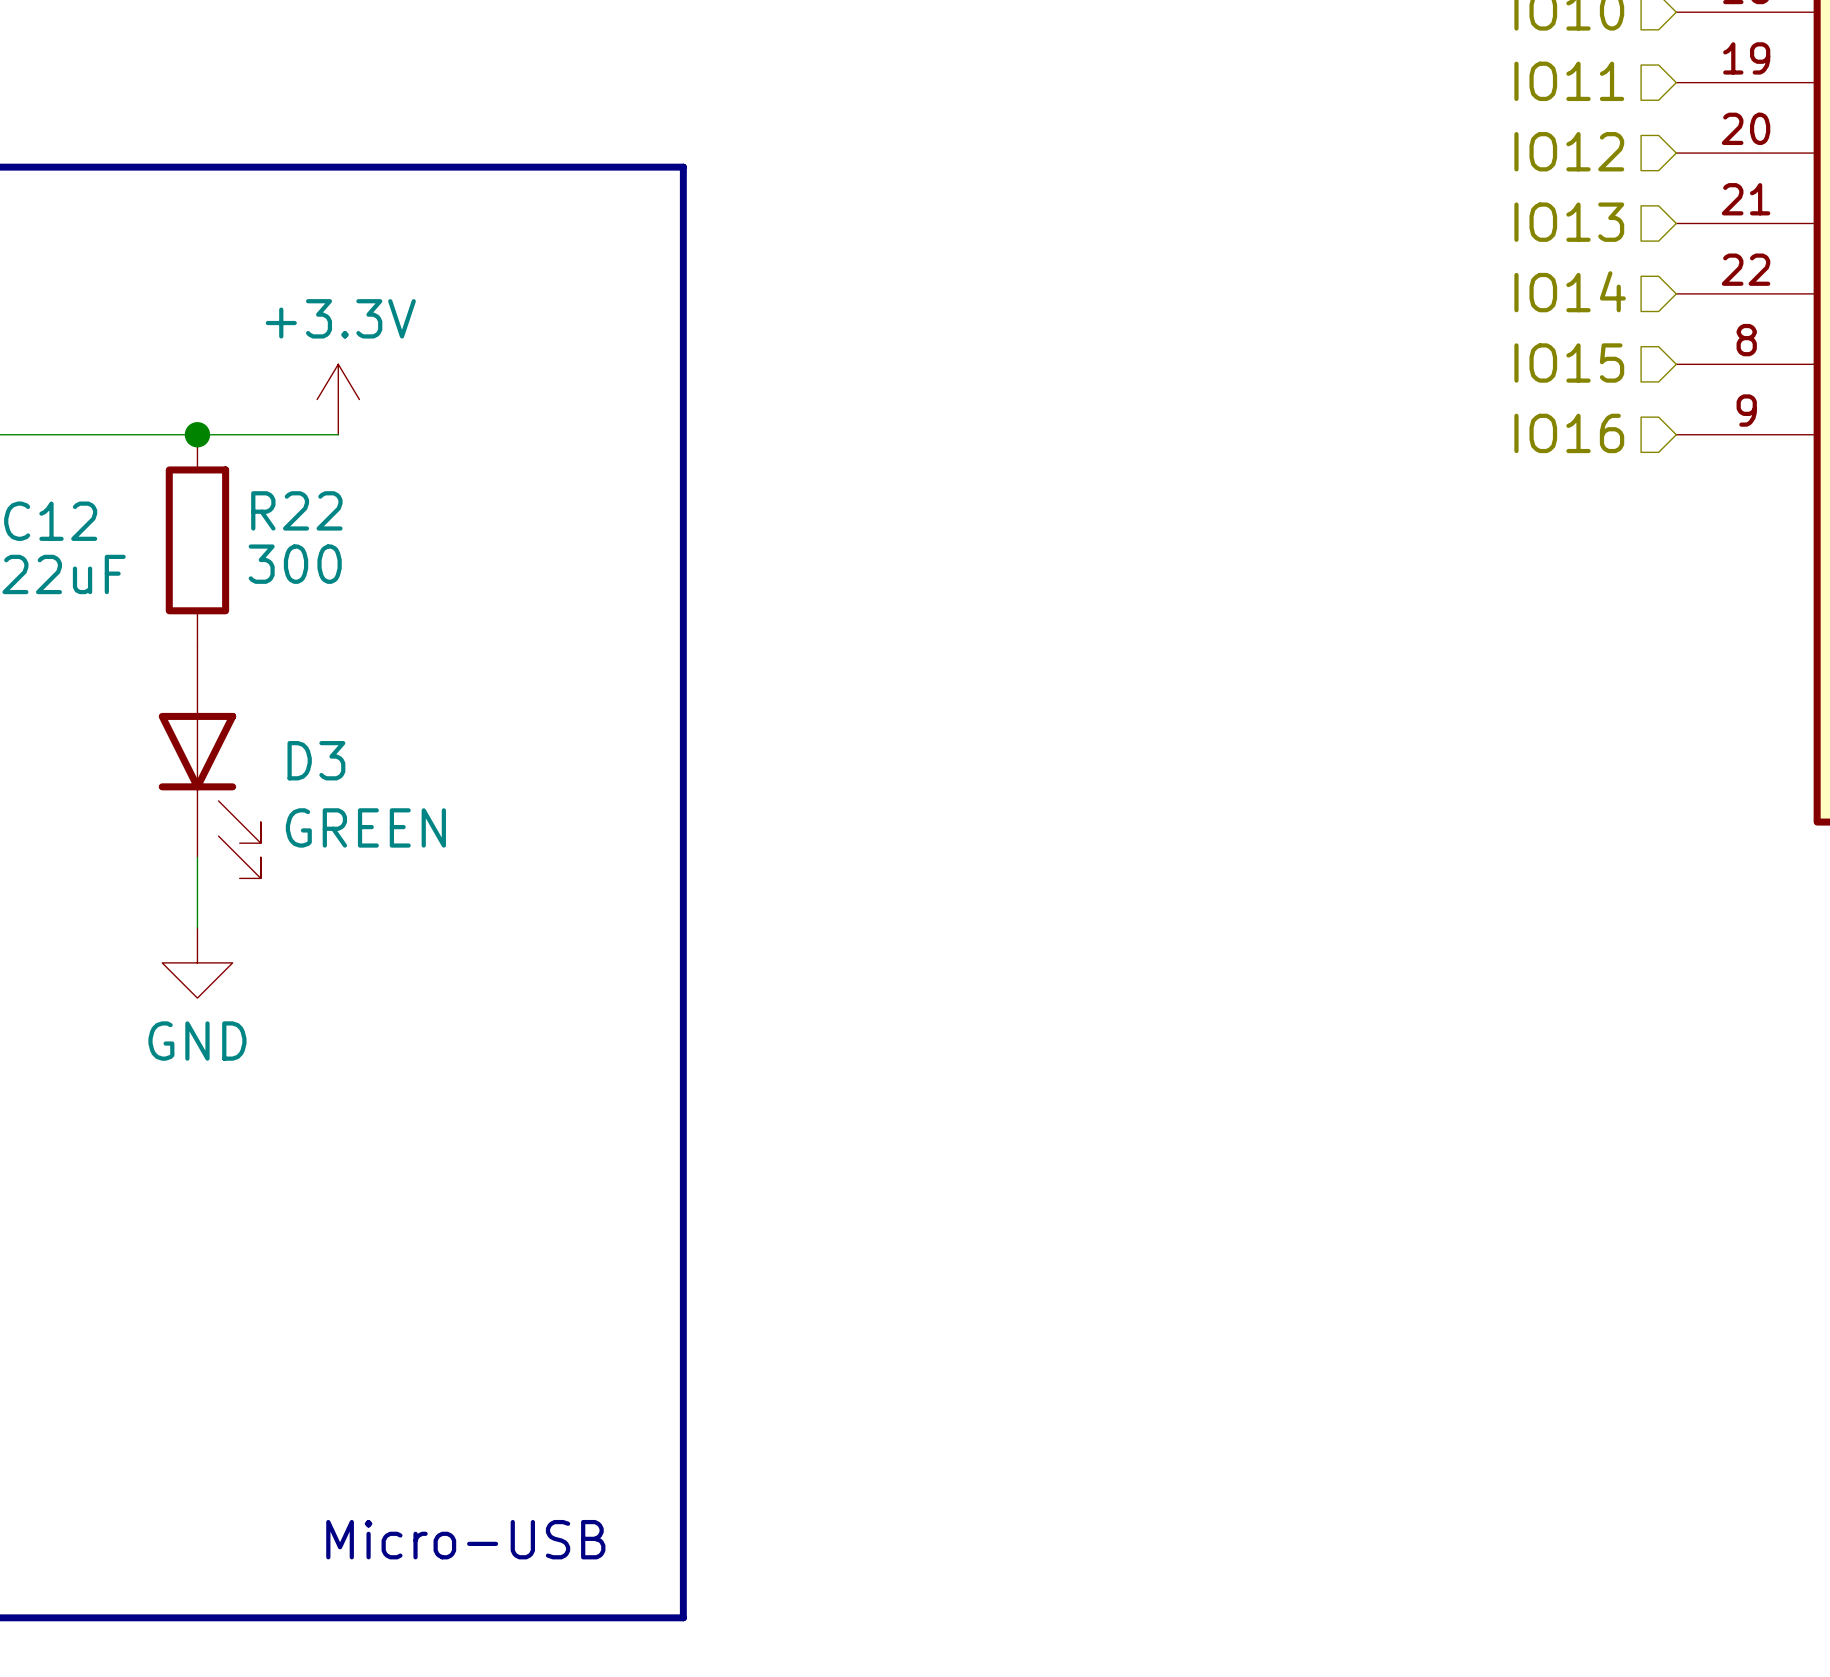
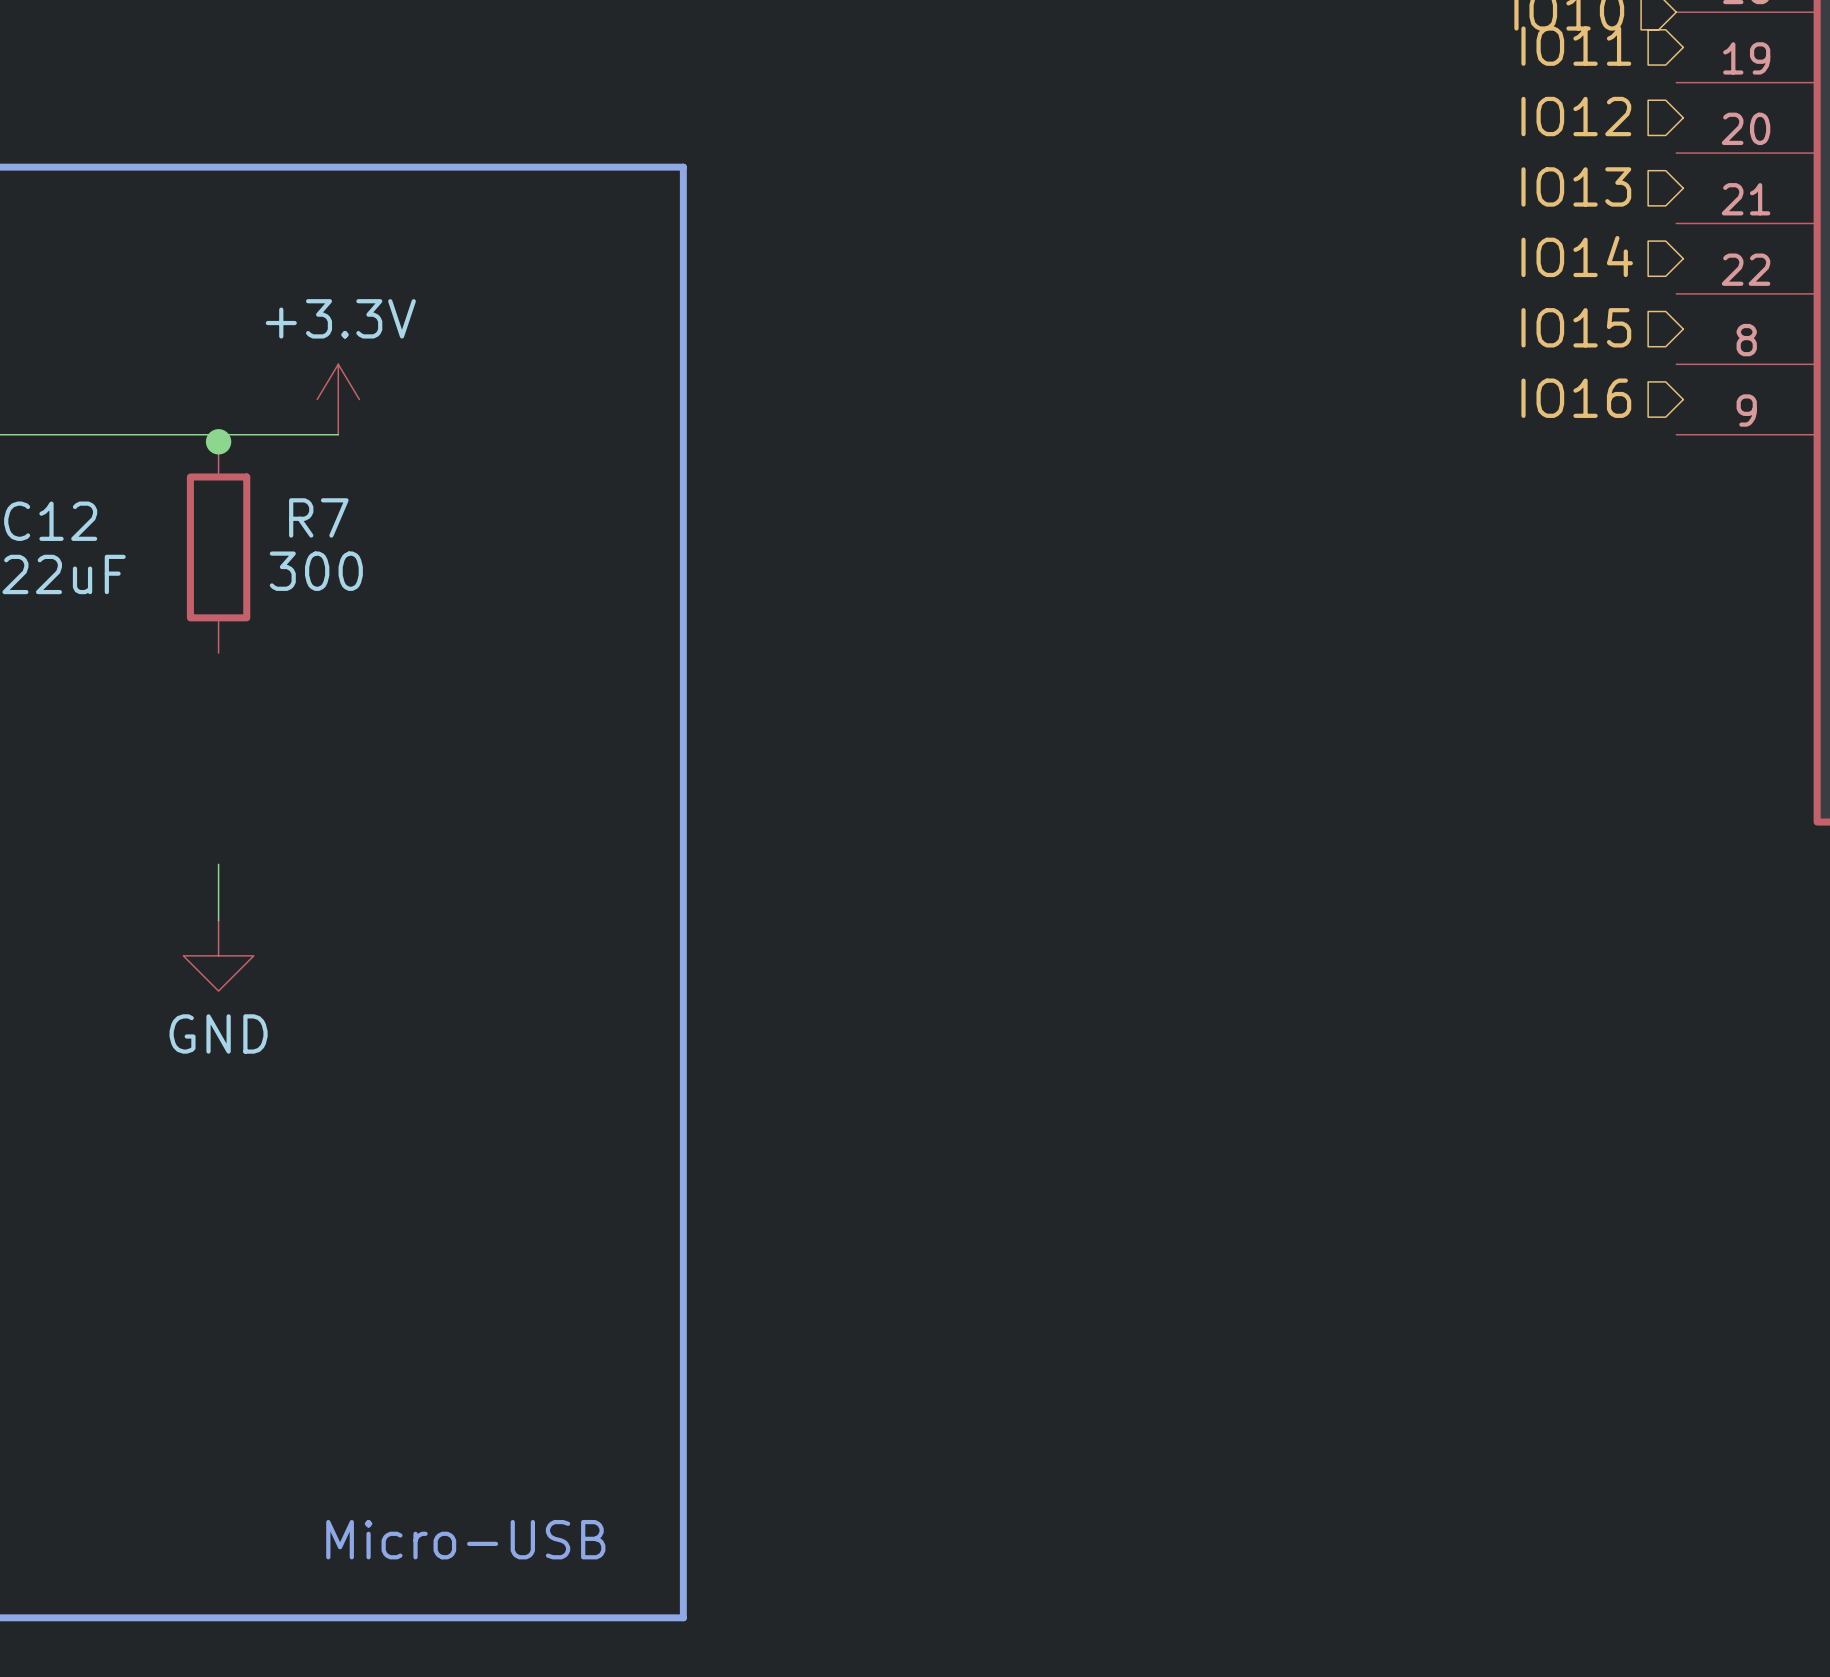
hierarchical label position: IO11 (1569, 81) -> IO11 (1576, 46)
hierarchical label position: IO12 (1569, 151) -> IO12 (1576, 116)
hierarchical label position: IO13 (1569, 222) -> IO13 (1576, 186)
hierarchical label position: IO14 (1570, 291) -> IO14 (1577, 256)
hierarchical label position: IO15 (1569, 363) -> IO15 (1576, 327)
hierarchical label position: IO16 (1569, 433) -> IO16 (1576, 398)
junction position: (197, 434) -> (218, 441)
R22 name: R22 (296, 510) -> R7 (318, 517)
R22 position: (197, 540) -> (218, 547)
D3: GREEN (209, 762) -> none
wire: (197, 857) (197, 927) -> none
wire: none -> (218, 864) (218, 920)
power symbol position: GND (197, 962) -> GND (218, 955)

